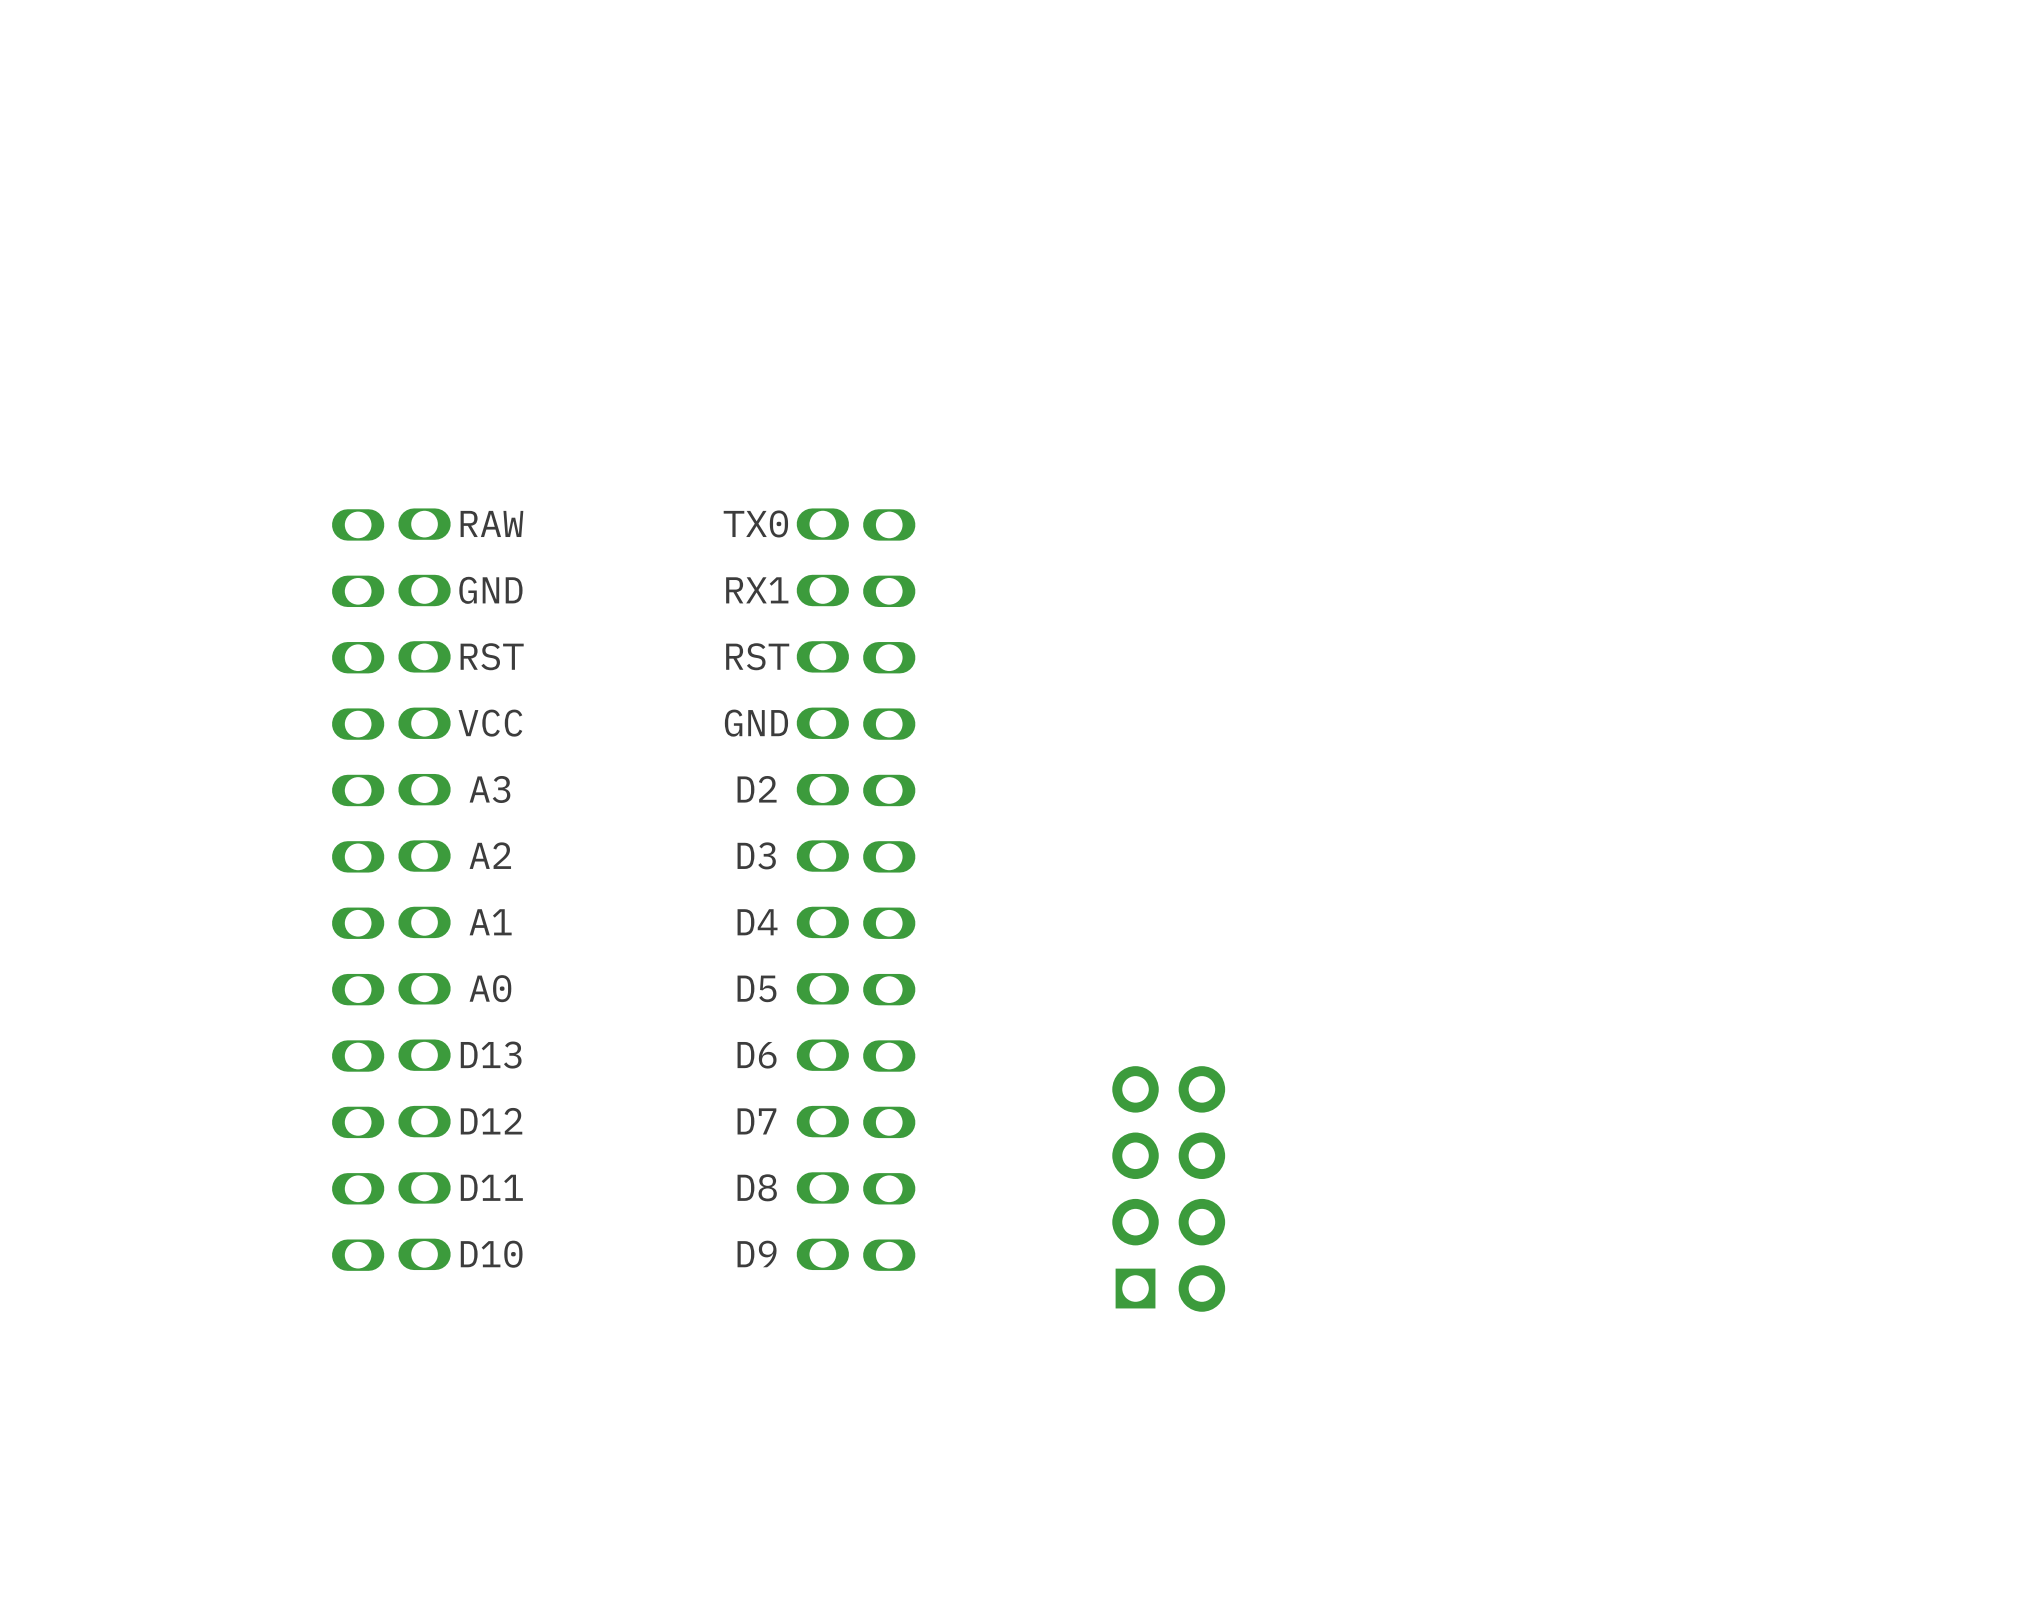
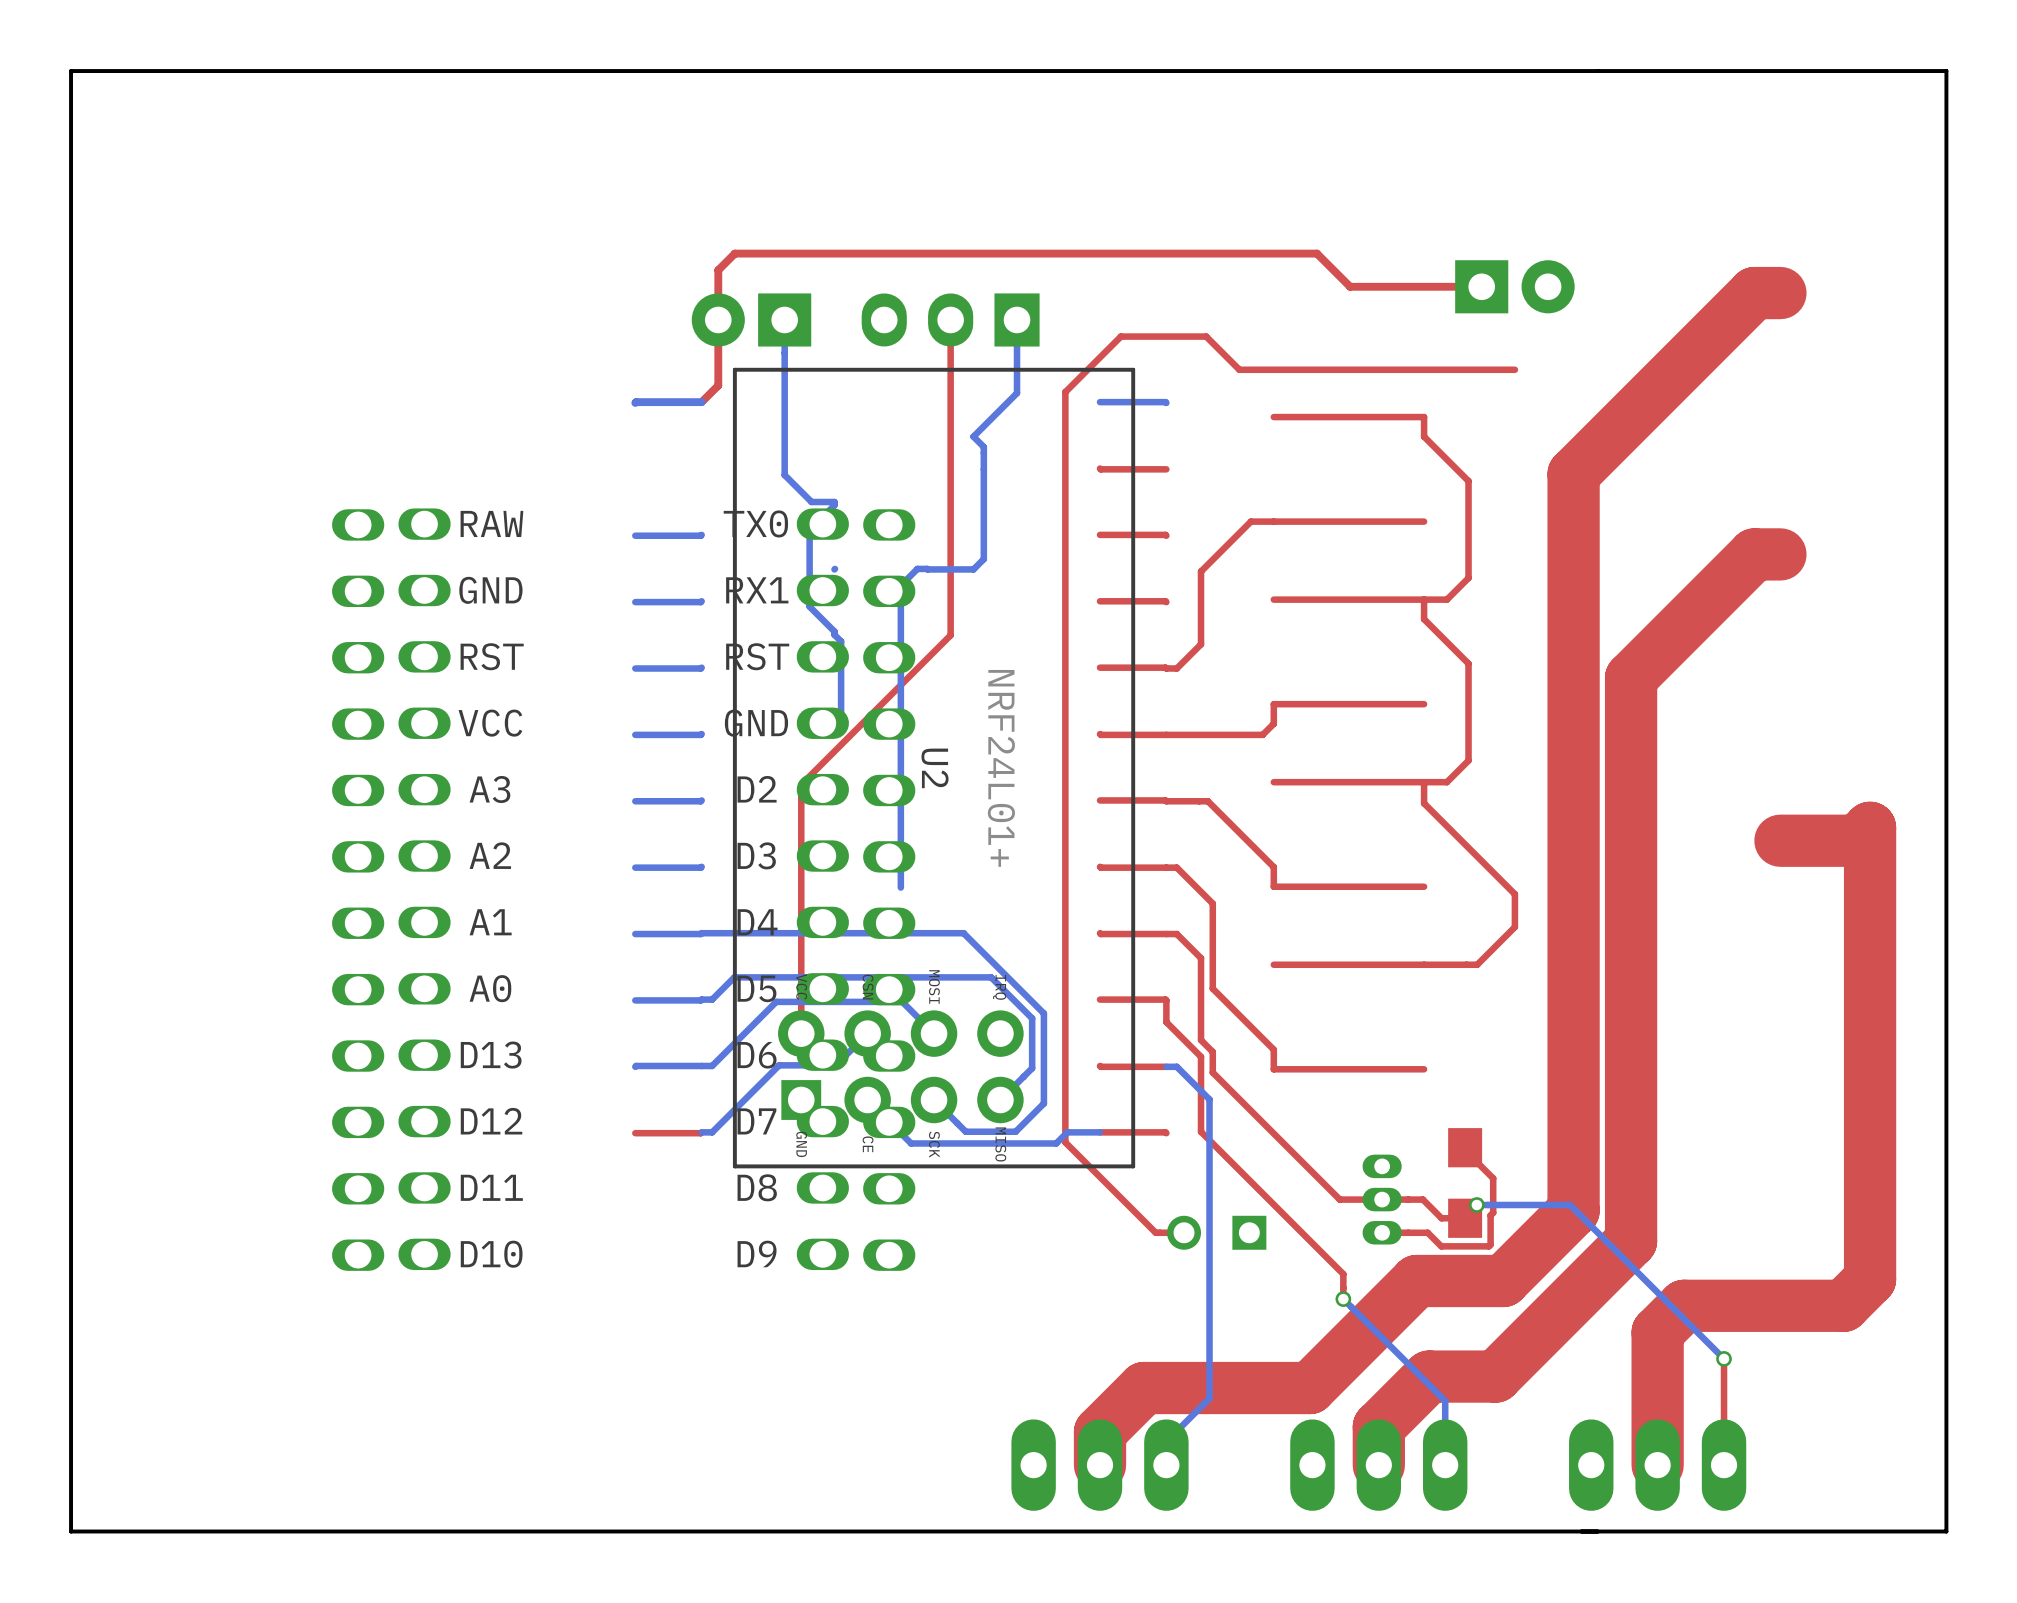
board edge: none -> (1946, 71) (71, 71) (71, 1531) (1946, 1531) (1946, 71)
top track: none -> (1481, 286) (1350, 286) (1316, 253) (734, 253) (718, 270) (718, 385) (701, 402)
part: none -> (1514, 286)
top track: none -> (1780, 293) (1754, 293) (1573, 474) (1573, 1210) (1503, 1280) (1416, 1280) (1309, 1388) (1144, 1388) (1100, 1432) (1100, 1465) (1100, 1441)
part: none -> (751, 319)
bottom track: none -> (784, 319) (784, 475) (811, 502) (834, 502) (834, 505) (809, 530) (809, 606) (834, 631) (834, 634) (841, 641) (841, 714)
top track: none -> (950, 319) (950, 635) (801, 784) (801, 1033)
part: none -> (950, 319)
bottom track: none -> (1017, 319) (1017, 393) (973, 436) (983, 446) (983, 559) (973, 569) (917, 568) (900, 585) (900, 887)
top track: none -> (1514, 369) (1239, 369) (1206, 336) (1120, 336) (1065, 392) (1065, 1142) (1155, 1232) (1184, 1231)
bottom track: none -> (701, 402) (635, 402)
bottom track: none -> (1099, 402) (1166, 402)
top track: none -> (1273, 417) (1424, 417) (1424, 436) (1468, 481) (1468, 578) (1446, 599) (1273, 599)
top track: none -> (1099, 468) (1166, 469)
top track: none -> (1424, 521) (1250, 521) (1201, 571) (1201, 644) (1176, 668) (1099, 667)
bottom track: none -> (701, 534) (635, 535)
top track: none -> (1099, 534) (1166, 535)
top track: none -> (1780, 554) (1754, 554) (1631, 677) (1631, 1241) (1495, 1376) (1429, 1376) (1378, 1426) (1378, 1465) (1378, 1441)
bottom track: none -> (834, 568) (834, 569)
top track: none -> (1424, 599) (1424, 619) (1468, 663) (1468, 760) (1446, 782) (1273, 782)
bottom track: none -> (701, 601) (635, 602)
top track: none -> (1099, 601) (1166, 602)
bottom track: none -> (701, 667) (635, 668)
top track: none -> (1424, 704) (1273, 704) (1273, 723) (1262, 734) (1099, 734)
bottom track: none -> (701, 734) (635, 734)
top track: none -> (1424, 782) (1424, 803) (1514, 894) (1514, 927) (1477, 964) (1273, 964)
bottom track: none -> (701, 800) (635, 801)
top track: none -> (1099, 800) (1207, 801) (1273, 867) (1273, 886) (1424, 886)
top track: none -> (1780, 840) (1857, 840) (1870, 827) (1870, 1279) (1843, 1305) (1684, 1305) (1657, 1332) (1657, 1465)
bottom track: none -> (701, 866) (635, 867)
top track: none -> (1099, 866) (1176, 867) (1212, 903) (1212, 988) (1273, 1049) (1273, 1069) (1424, 1069)
top track: none -> (1099, 933) (1176, 934) (1201, 958) (1201, 1040) (1212, 1051) (1212, 1072) (1339, 1199) (1422, 1199) (1441, 1218) (1465, 1218) (1476, 1204)
bottom track: none -> (635, 934) (963, 933) (1043, 1013) (1043, 1103) (1015, 1131) (965, 1131) (934, 1100)
top track: none -> (1099, 999) (1166, 1000) (1166, 1022) (1201, 1056) (1201, 1131) (1343, 1274) (1343, 1299)
bottom track: none -> (635, 1000) (712, 999) (734, 977) (991, 977) (1032, 1018) (1032, 1068) (1000, 1100)
bottom track: none -> (867, 1033) (835, 1065) (779, 1065) (712, 1132) (701, 1132)
bottom track: none -> (934, 1033) (902, 1001) (776, 1001) (712, 1065) (635, 1066)
top track: none -> (1099, 1065) (1166, 1066)
bottom track: none -> (1166, 1066) (1176, 1066) (1209, 1099) (1209, 1398) (1166, 1441) (1166, 1465)
bottom track: none -> (867, 1100) (911, 1143) (1056, 1143) (1067, 1132) (1099, 1132)
top track: none -> (701, 1132) (635, 1133)
top track: none -> (1099, 1132) (1166, 1133)
top track: none -> (1465, 1147) (1465, 1150) (1493, 1178) (1490, 1244) (1488, 1246) (1441, 1246) (1427, 1232) (1382, 1232)
part: none -> (1465, 1182)
U2 side: top (1168, 1188) -> bottom (934, 768)
part: none -> (1382, 1199)
bottom track: none -> (1476, 1204) (1570, 1204) (1724, 1358)
via: none -> (1476, 1204)
part: none -> (1216, 1232)
bottom track: none -> (1343, 1299) (1445, 1400) (1445, 1465)
via: none -> (1343, 1299)
top track: none -> (1724, 1358) (1724, 1465)
via: none -> (1724, 1358)
part: none -> (1100, 1465)
part: none -> (1378, 1465)
part: none -> (1657, 1465)

